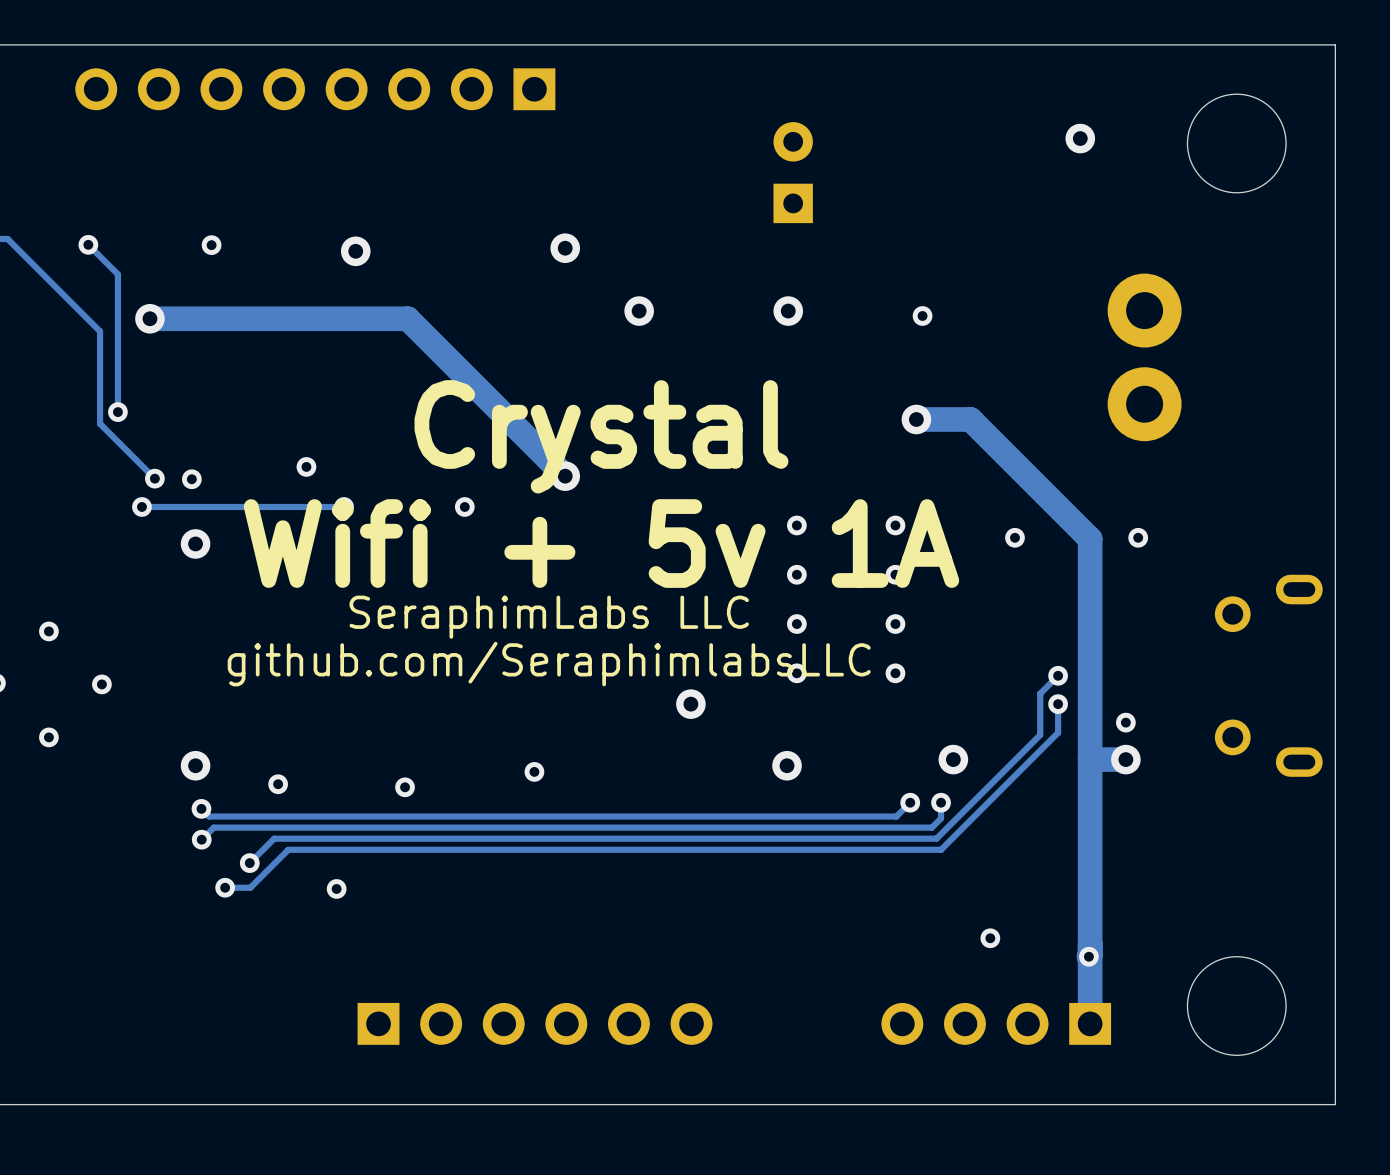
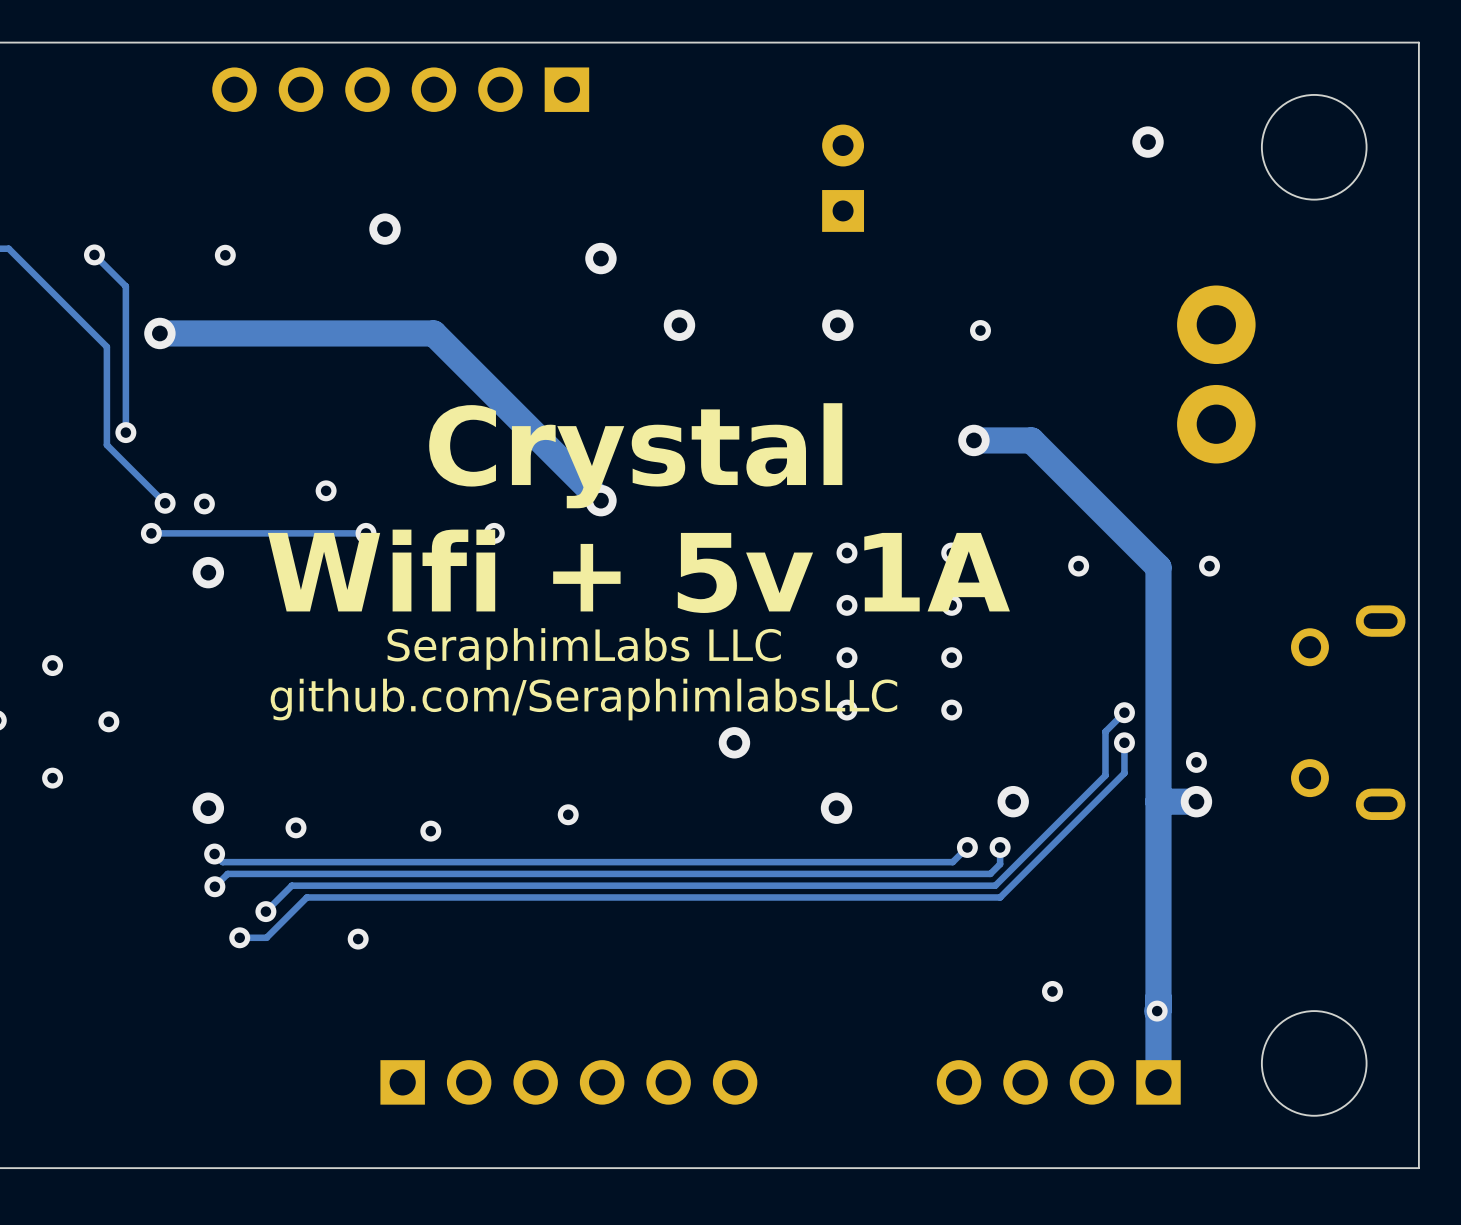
part: (315, 89) -> none
part: none -> (400, 89)
via position: (355, 251) -> (385, 229)

